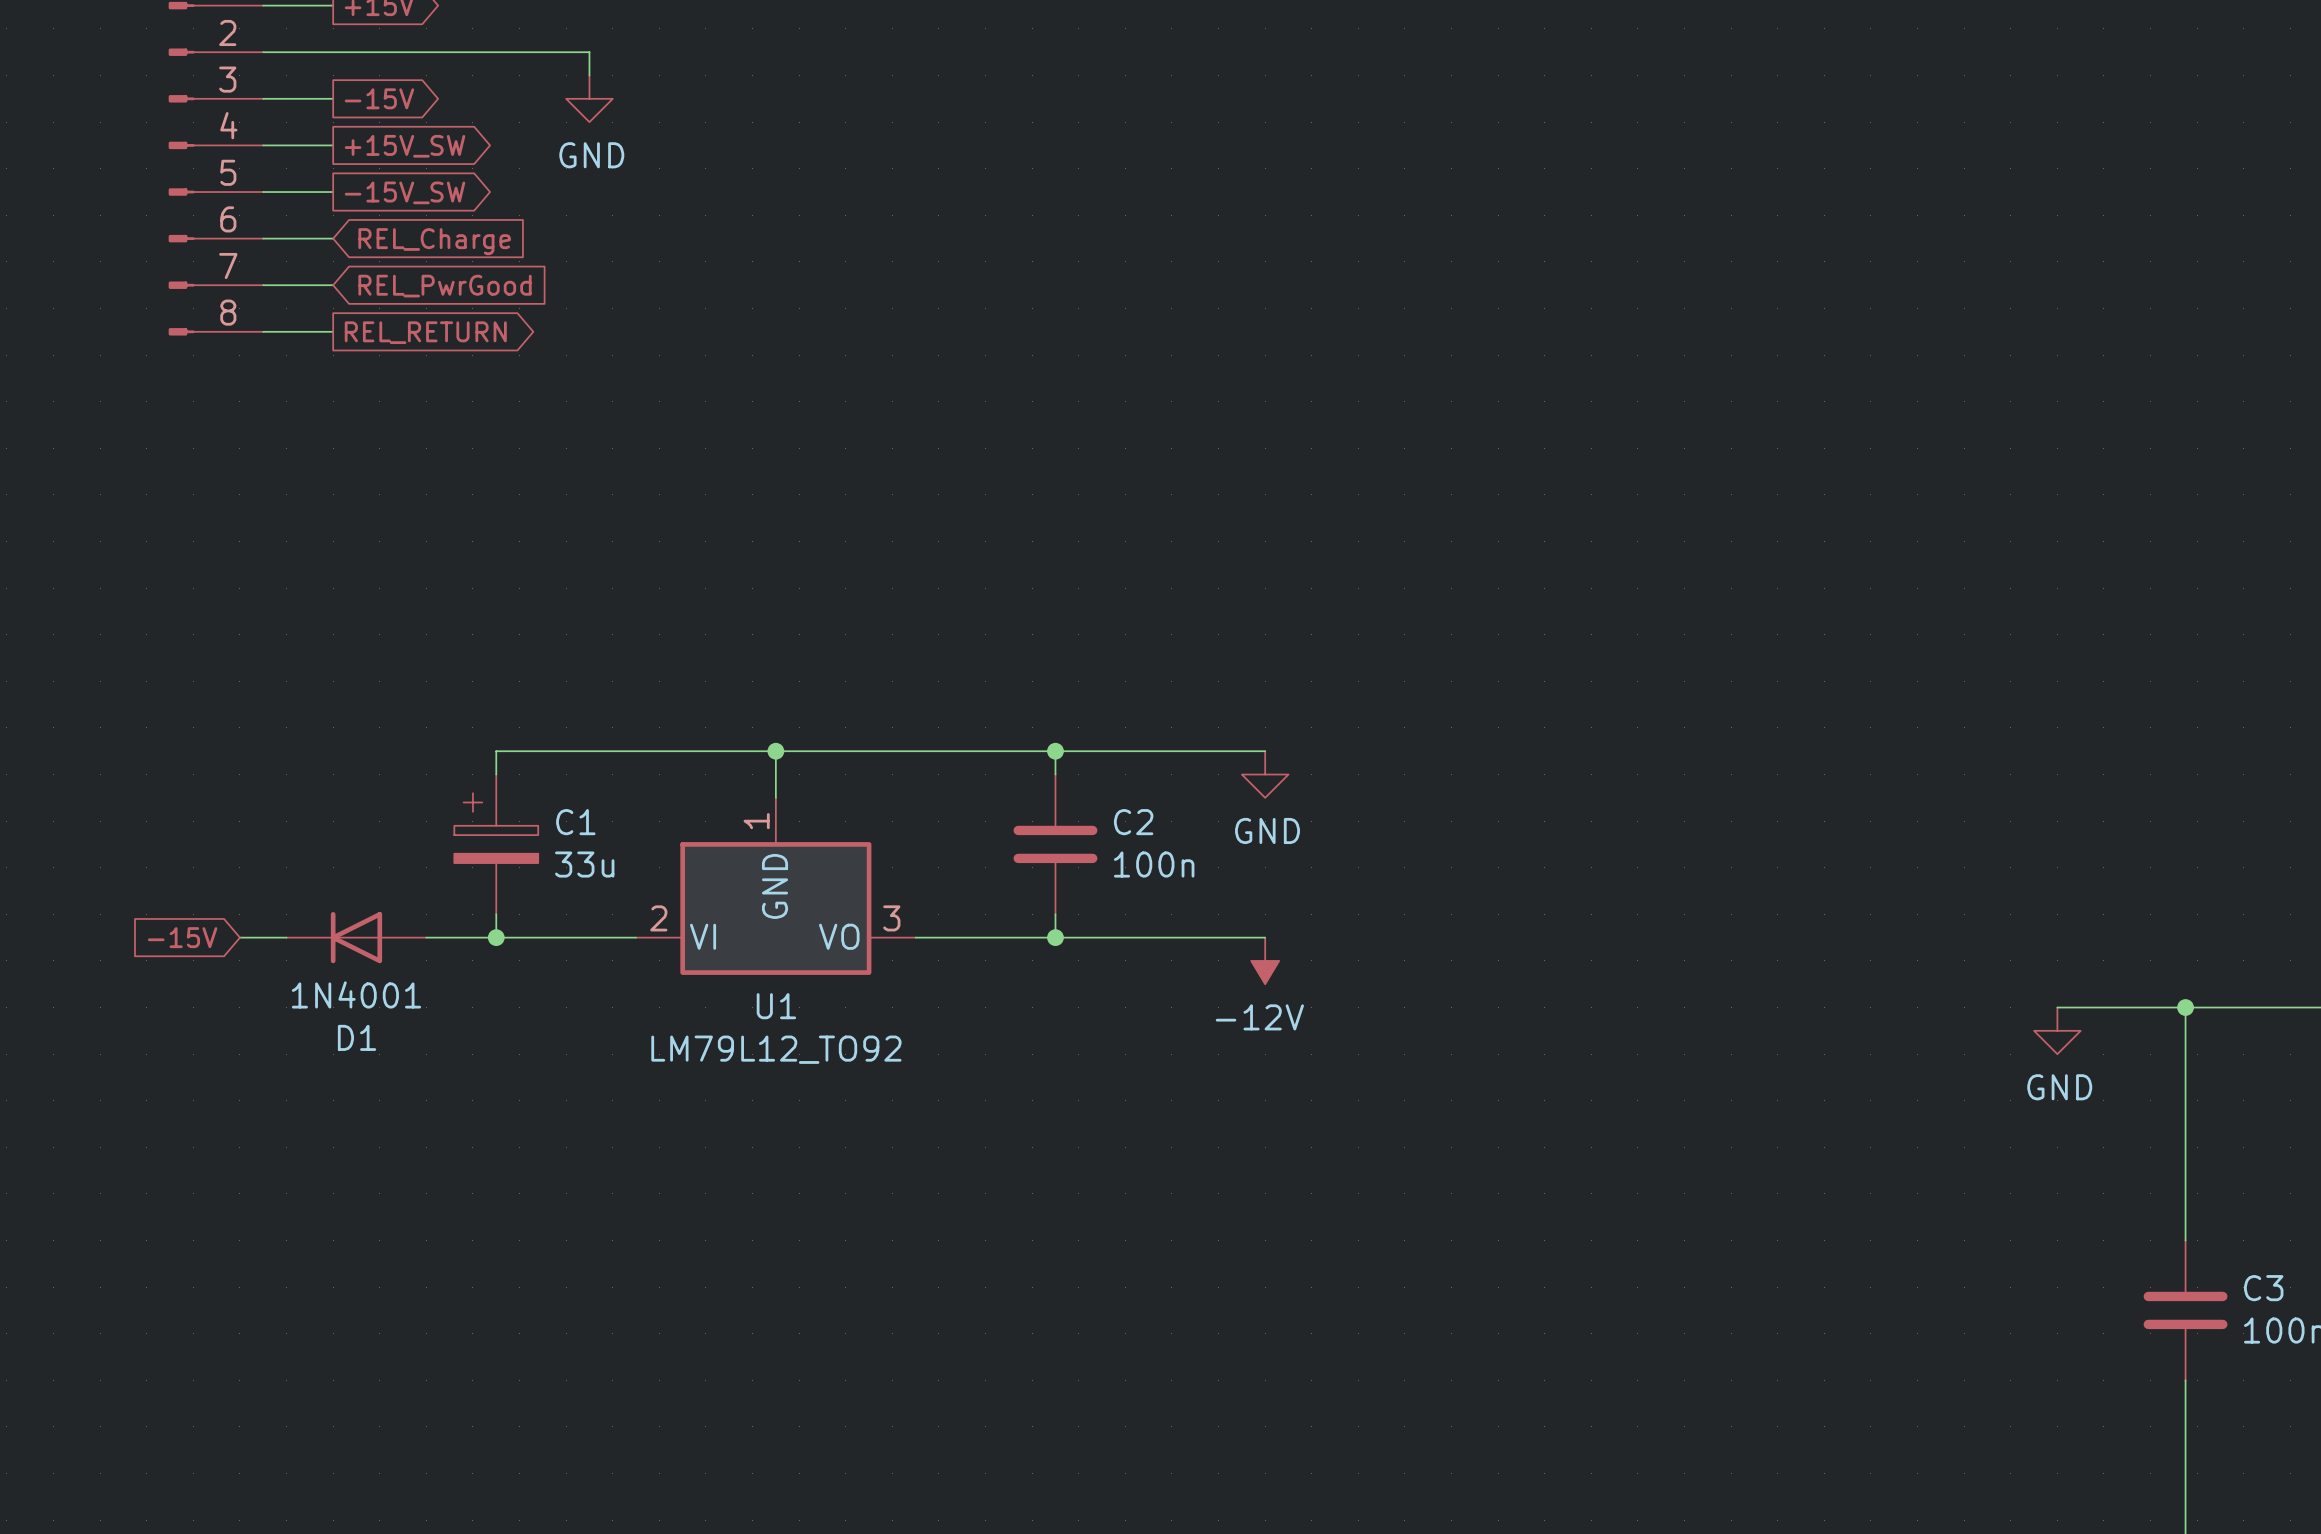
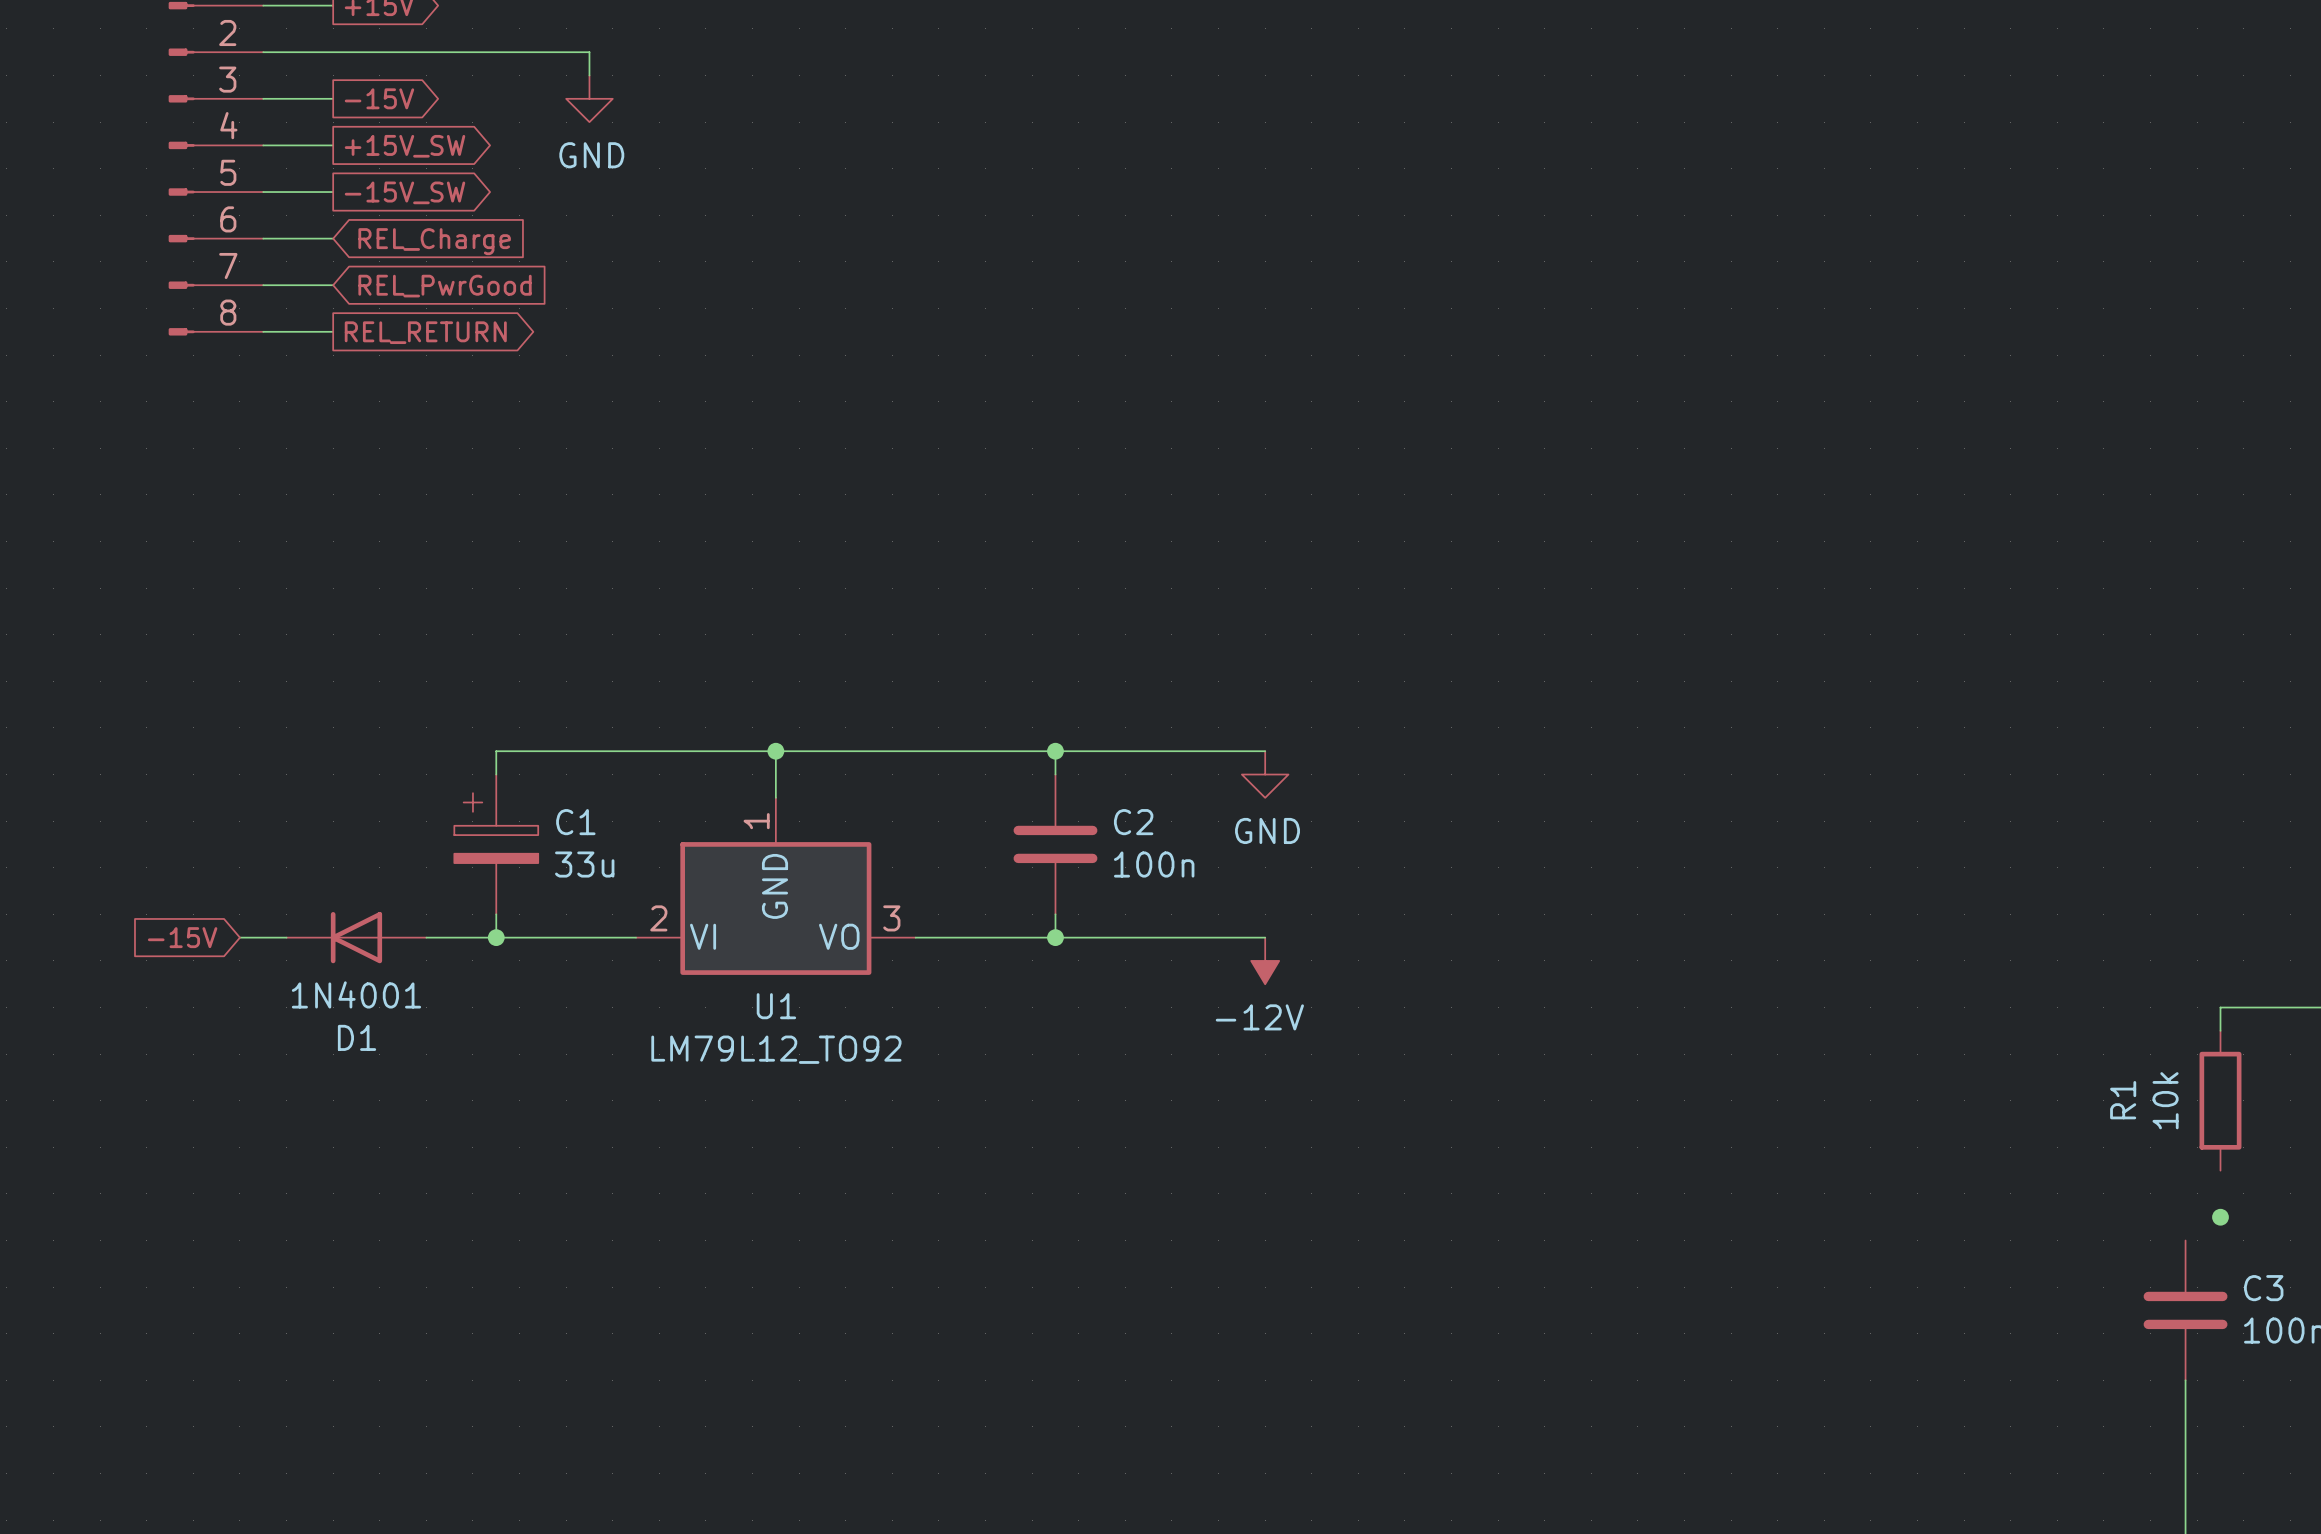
wire: (2057, 1007) (2220, 1007) -> (2220, 1030) (2220, 1007)
wire: (2185, 1007) (2185, 1240) -> none
junction: (2185, 1007) -> none
power symbol: GND (2057, 1030) -> none
R1: none -> 10k (2220, 1100)
junction: none -> (2220, 1217)

